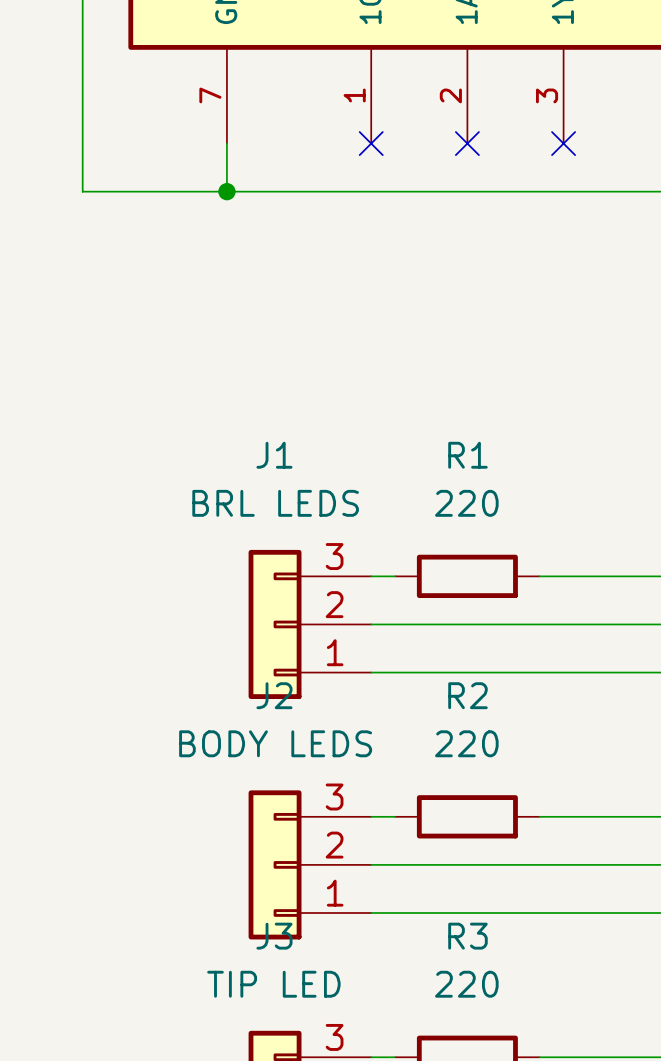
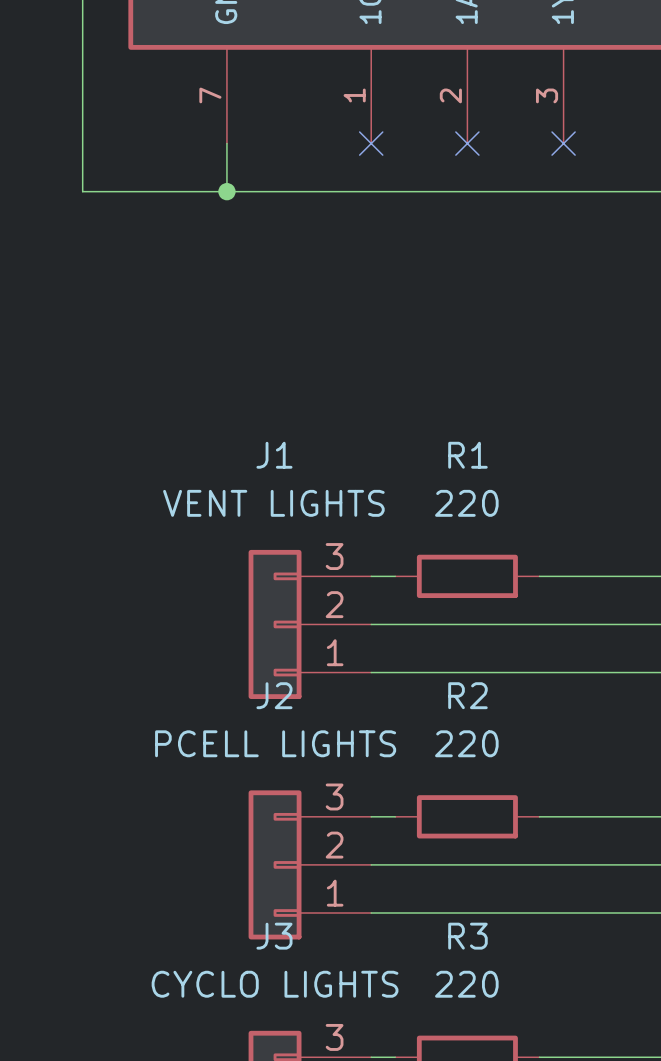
J1 value: BRL LEDS (275, 503) -> VENT LIGHTS (273, 503)
J2 value: BODY LEDS (275, 743) -> PCELL LIGHTS (275, 743)
J3 value: TIP LED (273, 984) -> CYCLO LIGHTS (275, 984)

